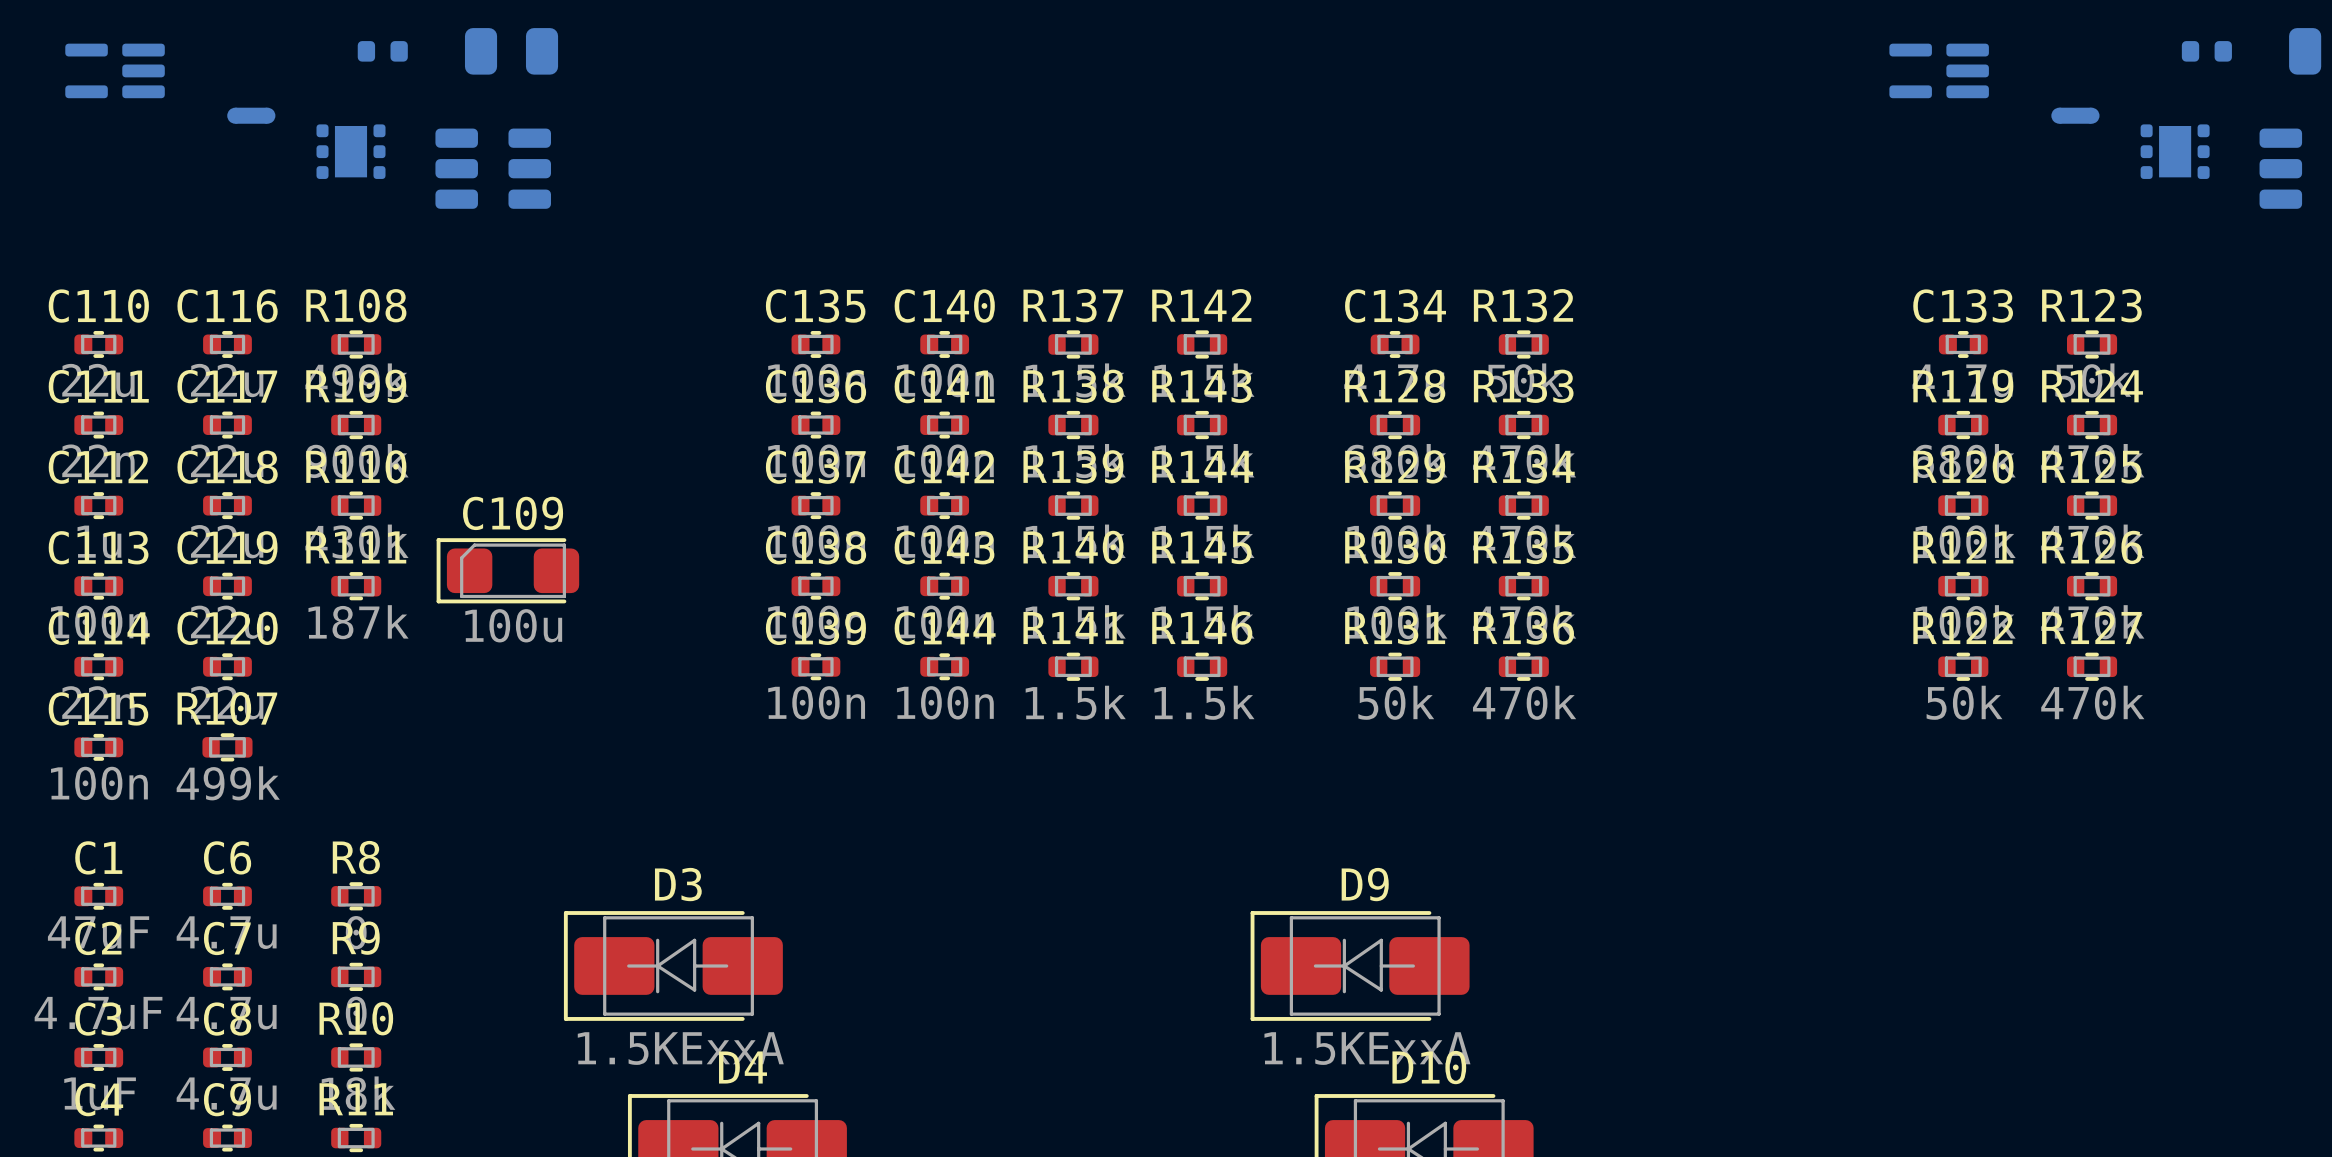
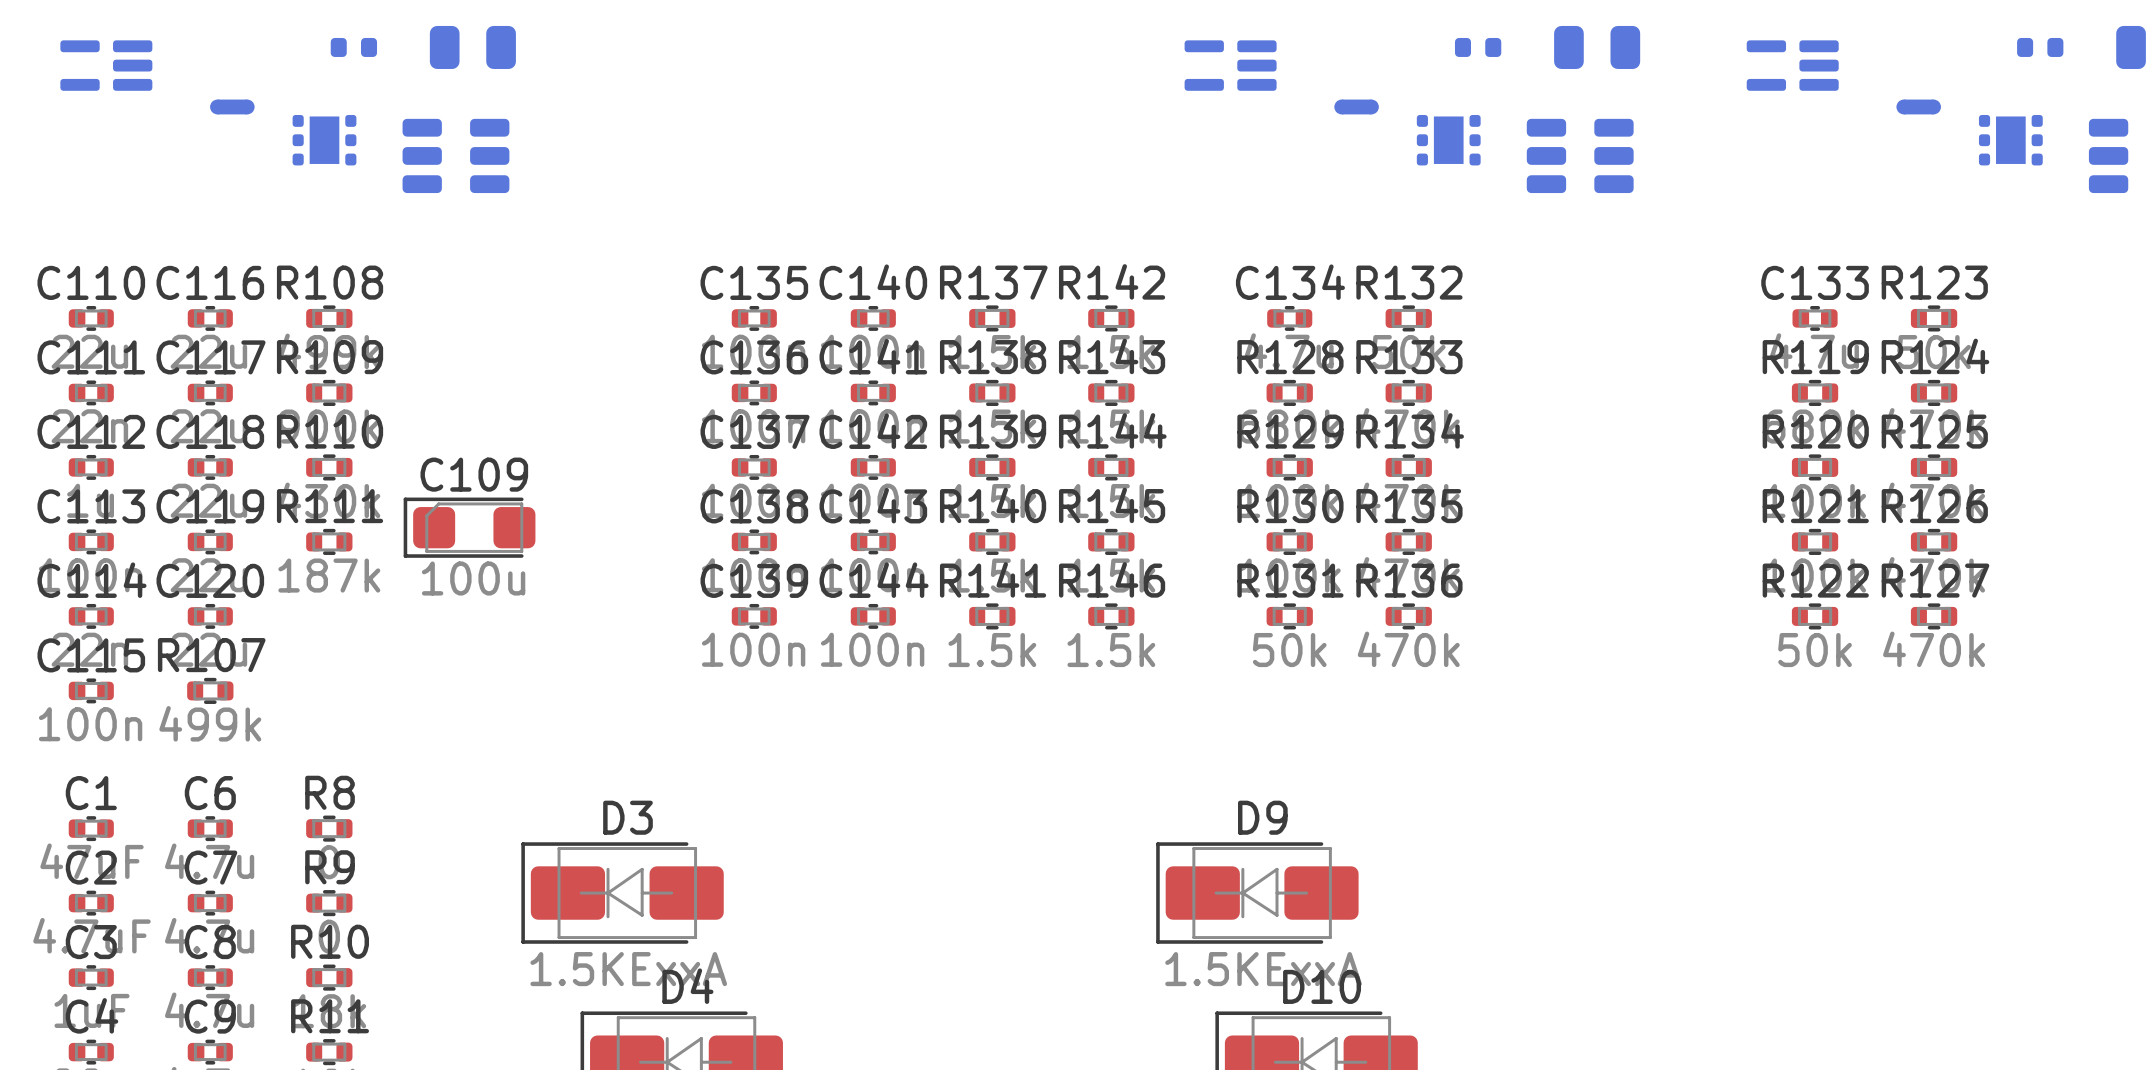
part: none -> (1478, 47)
part: none -> (1597, 47)
part: none -> (1230, 65)
part: none -> (1356, 106)
part: none -> (1448, 140)
part: none -> (1580, 155)

